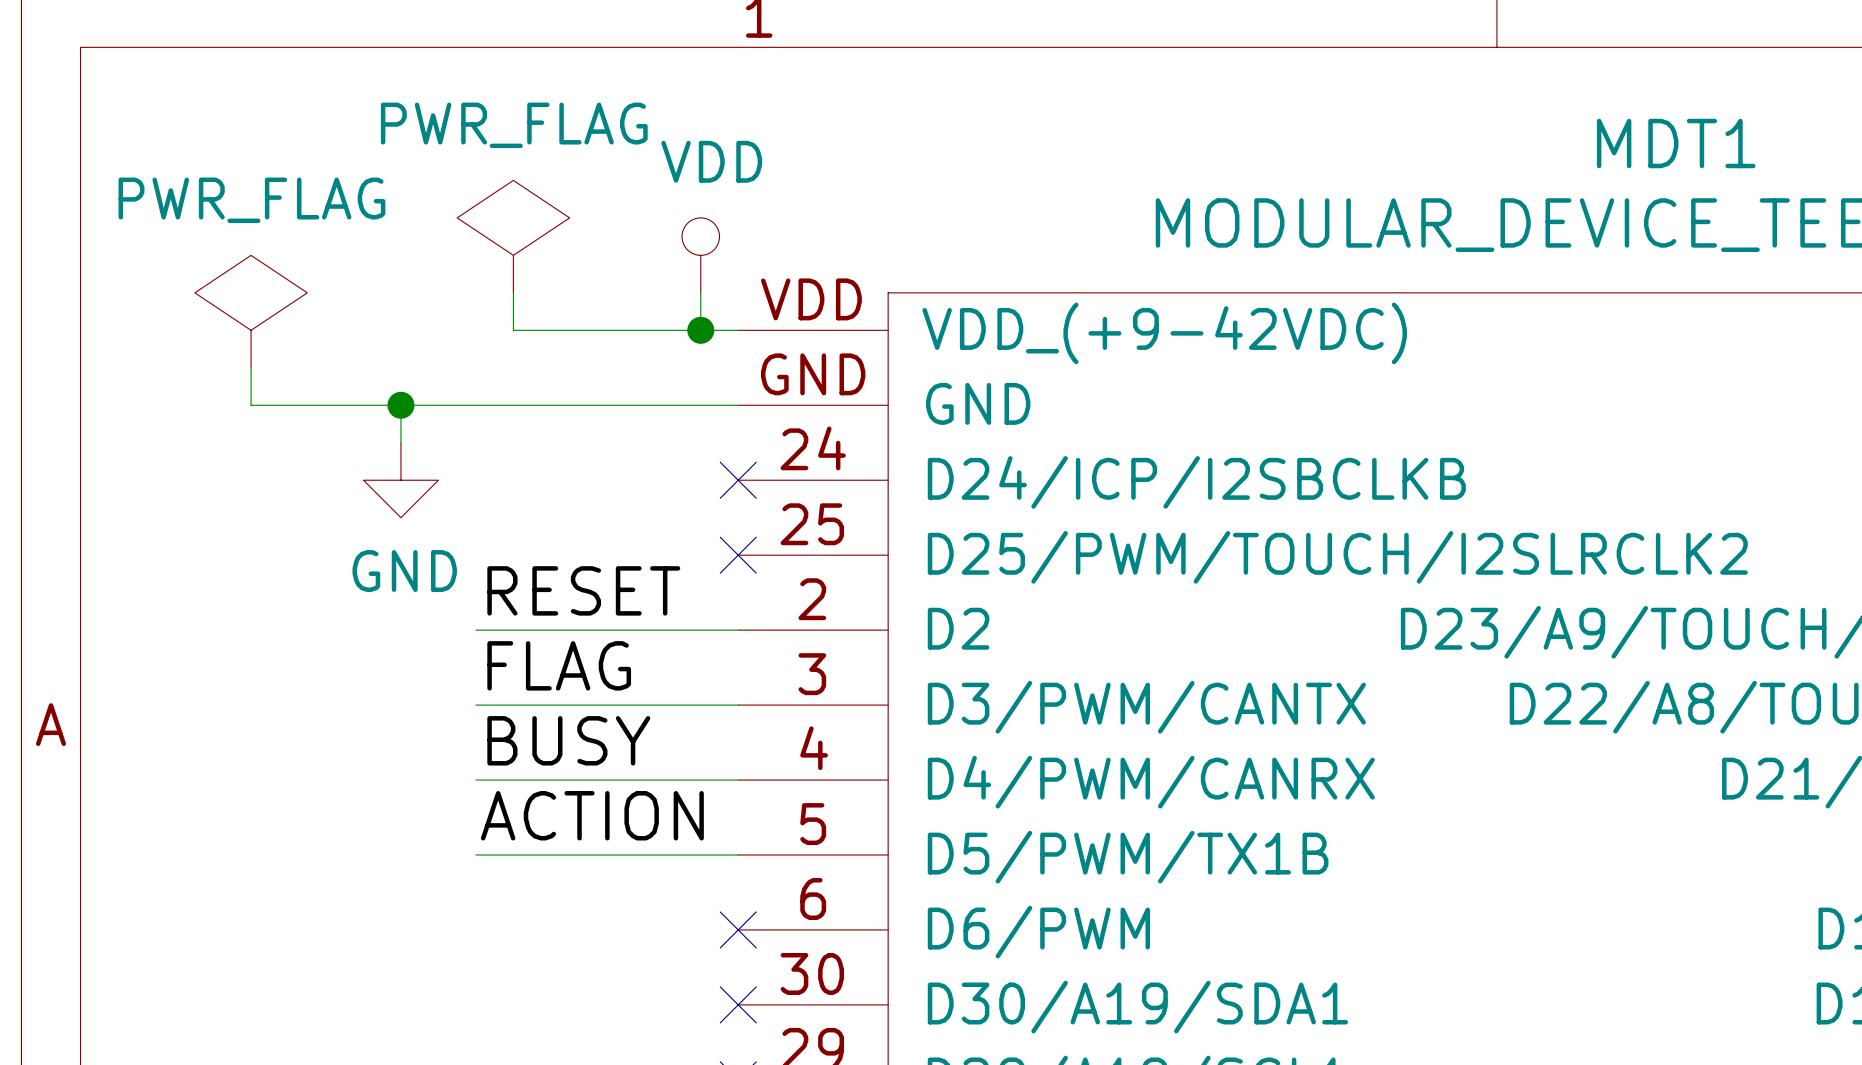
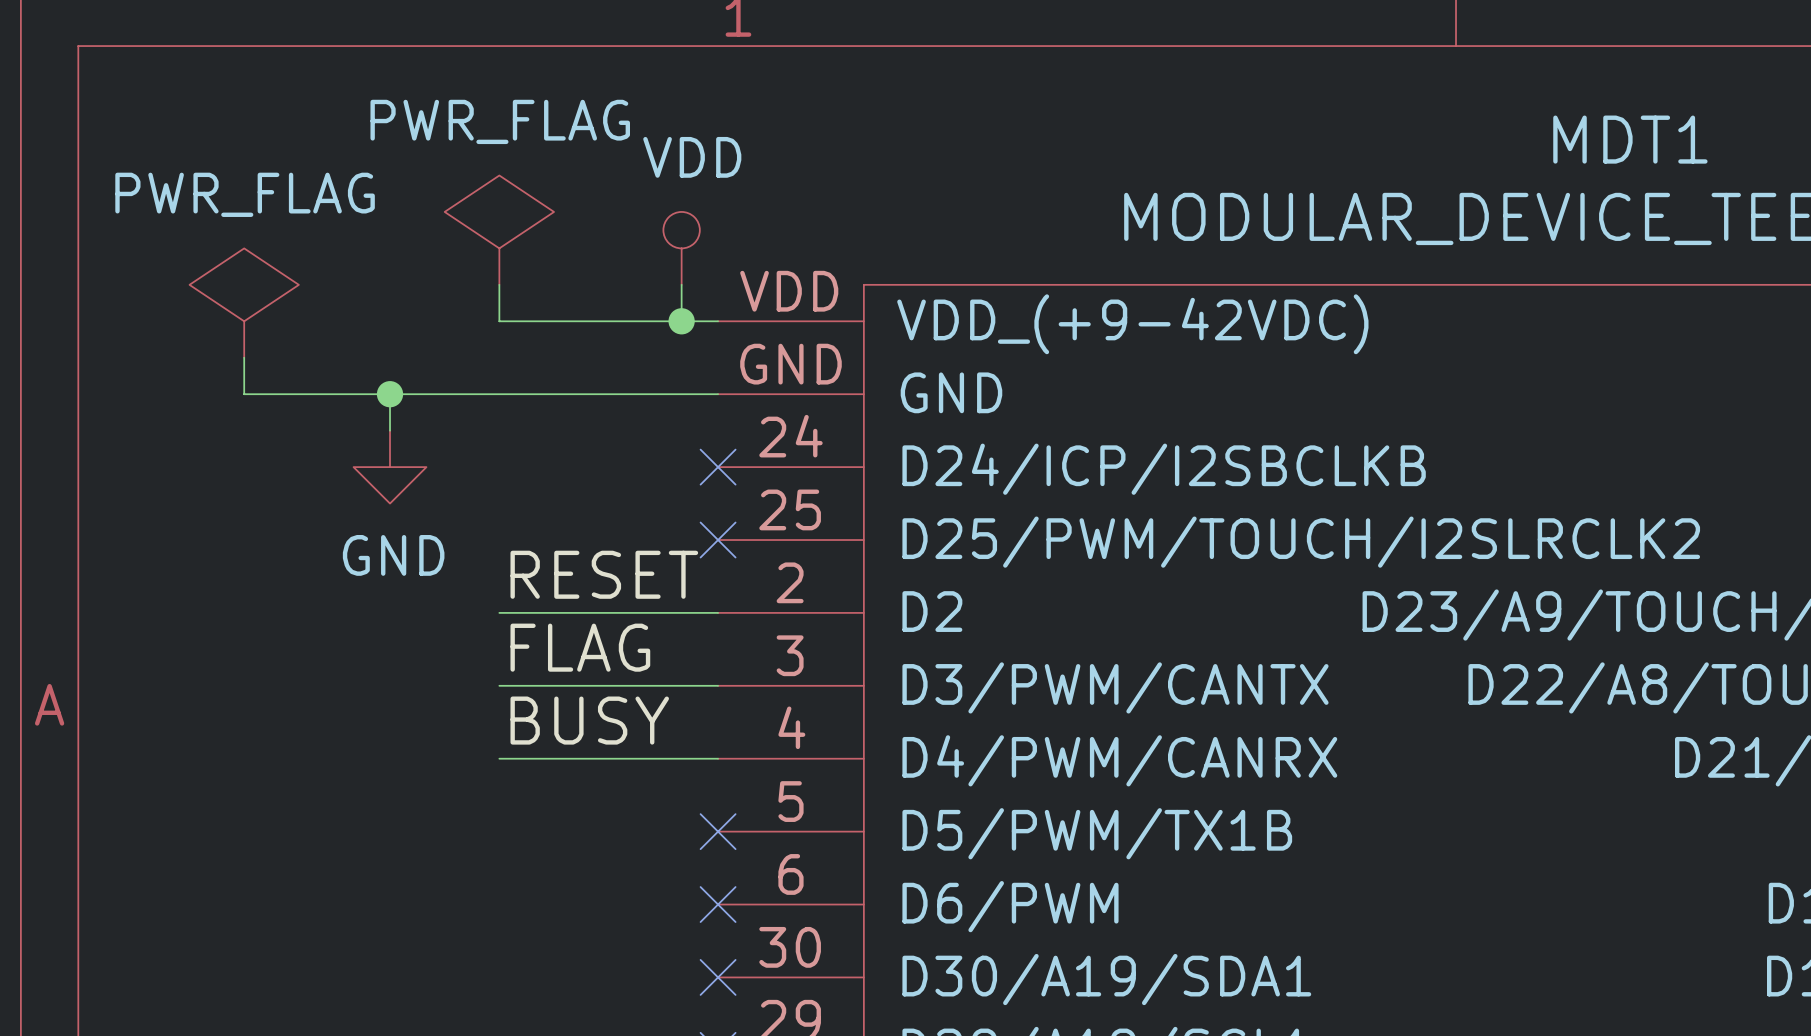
label position: RESET (583, 590) -> RESET (604, 574)
wire: (475, 630) (513, 630) -> none
label position: FLAG (559, 665) -> FLAG (580, 647)
wire: (475, 705) (513, 705) -> none
label position: BUSY (568, 740) -> BUSY (589, 720)
wire: (475, 780) (513, 780) -> none
label: ACTION (592, 815) -> none
wire: (475, 854) (738, 854) -> none
no-connect mark: none -> (718, 831)

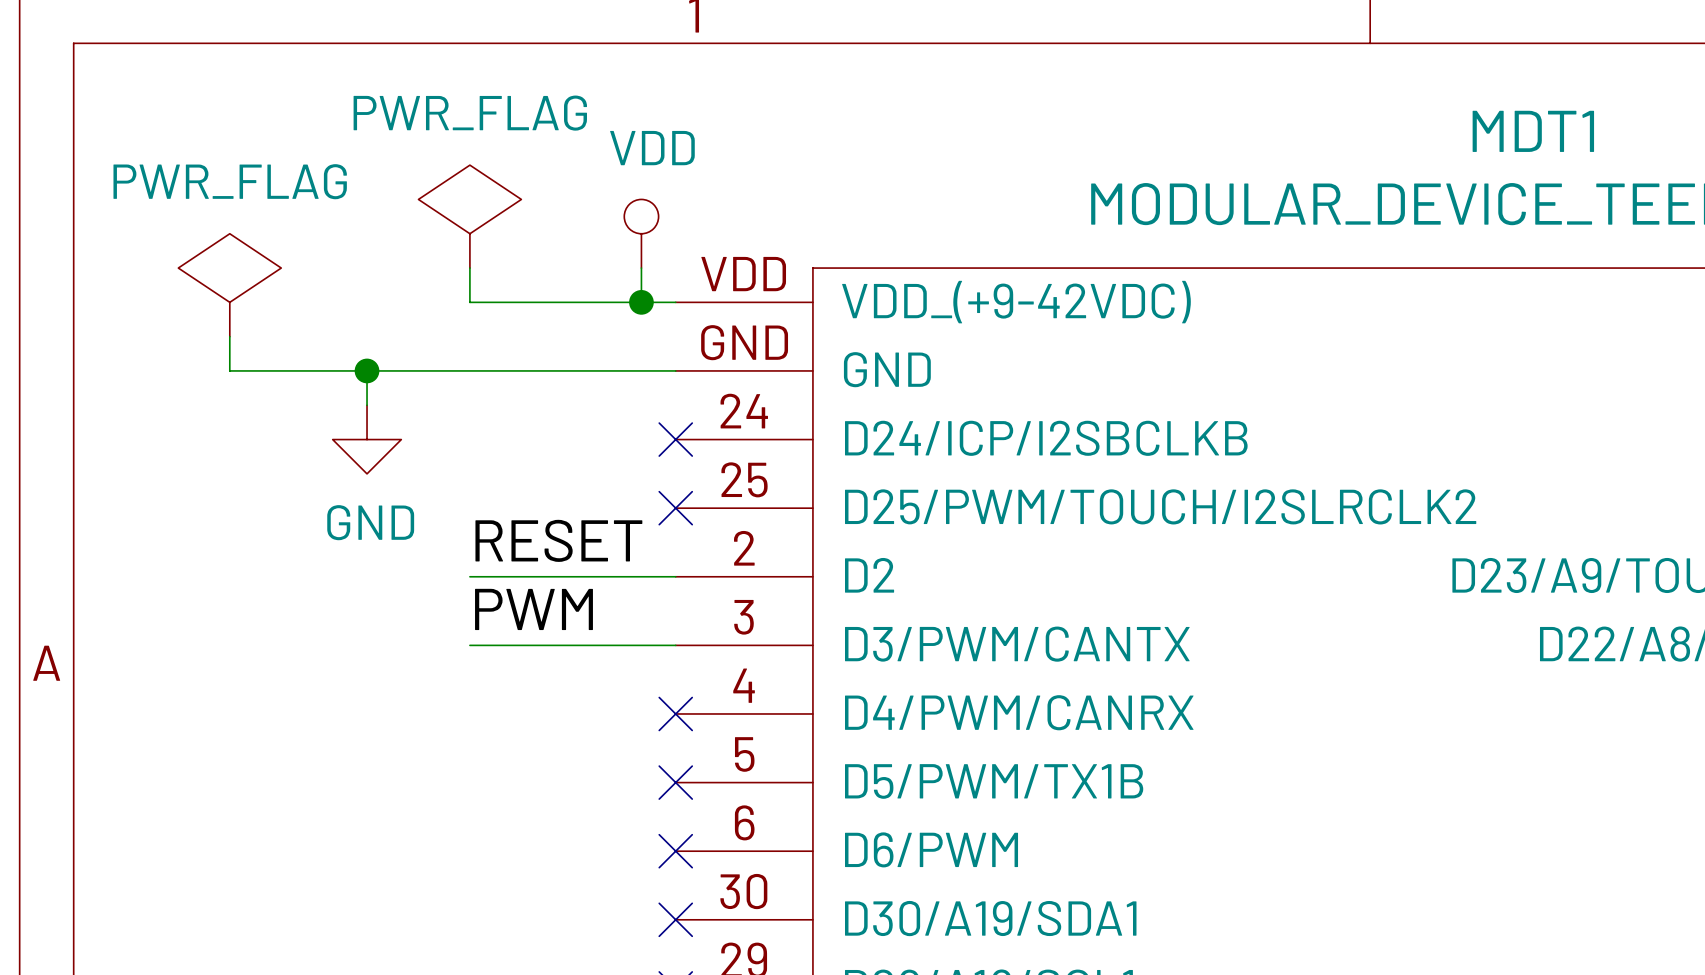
label: FLAG (580, 647) -> PWM (533, 609)
label: BUSY (589, 720) -> none
wire: (499, 758) (718, 758) -> none
no-connect mark: none -> (675, 713)

